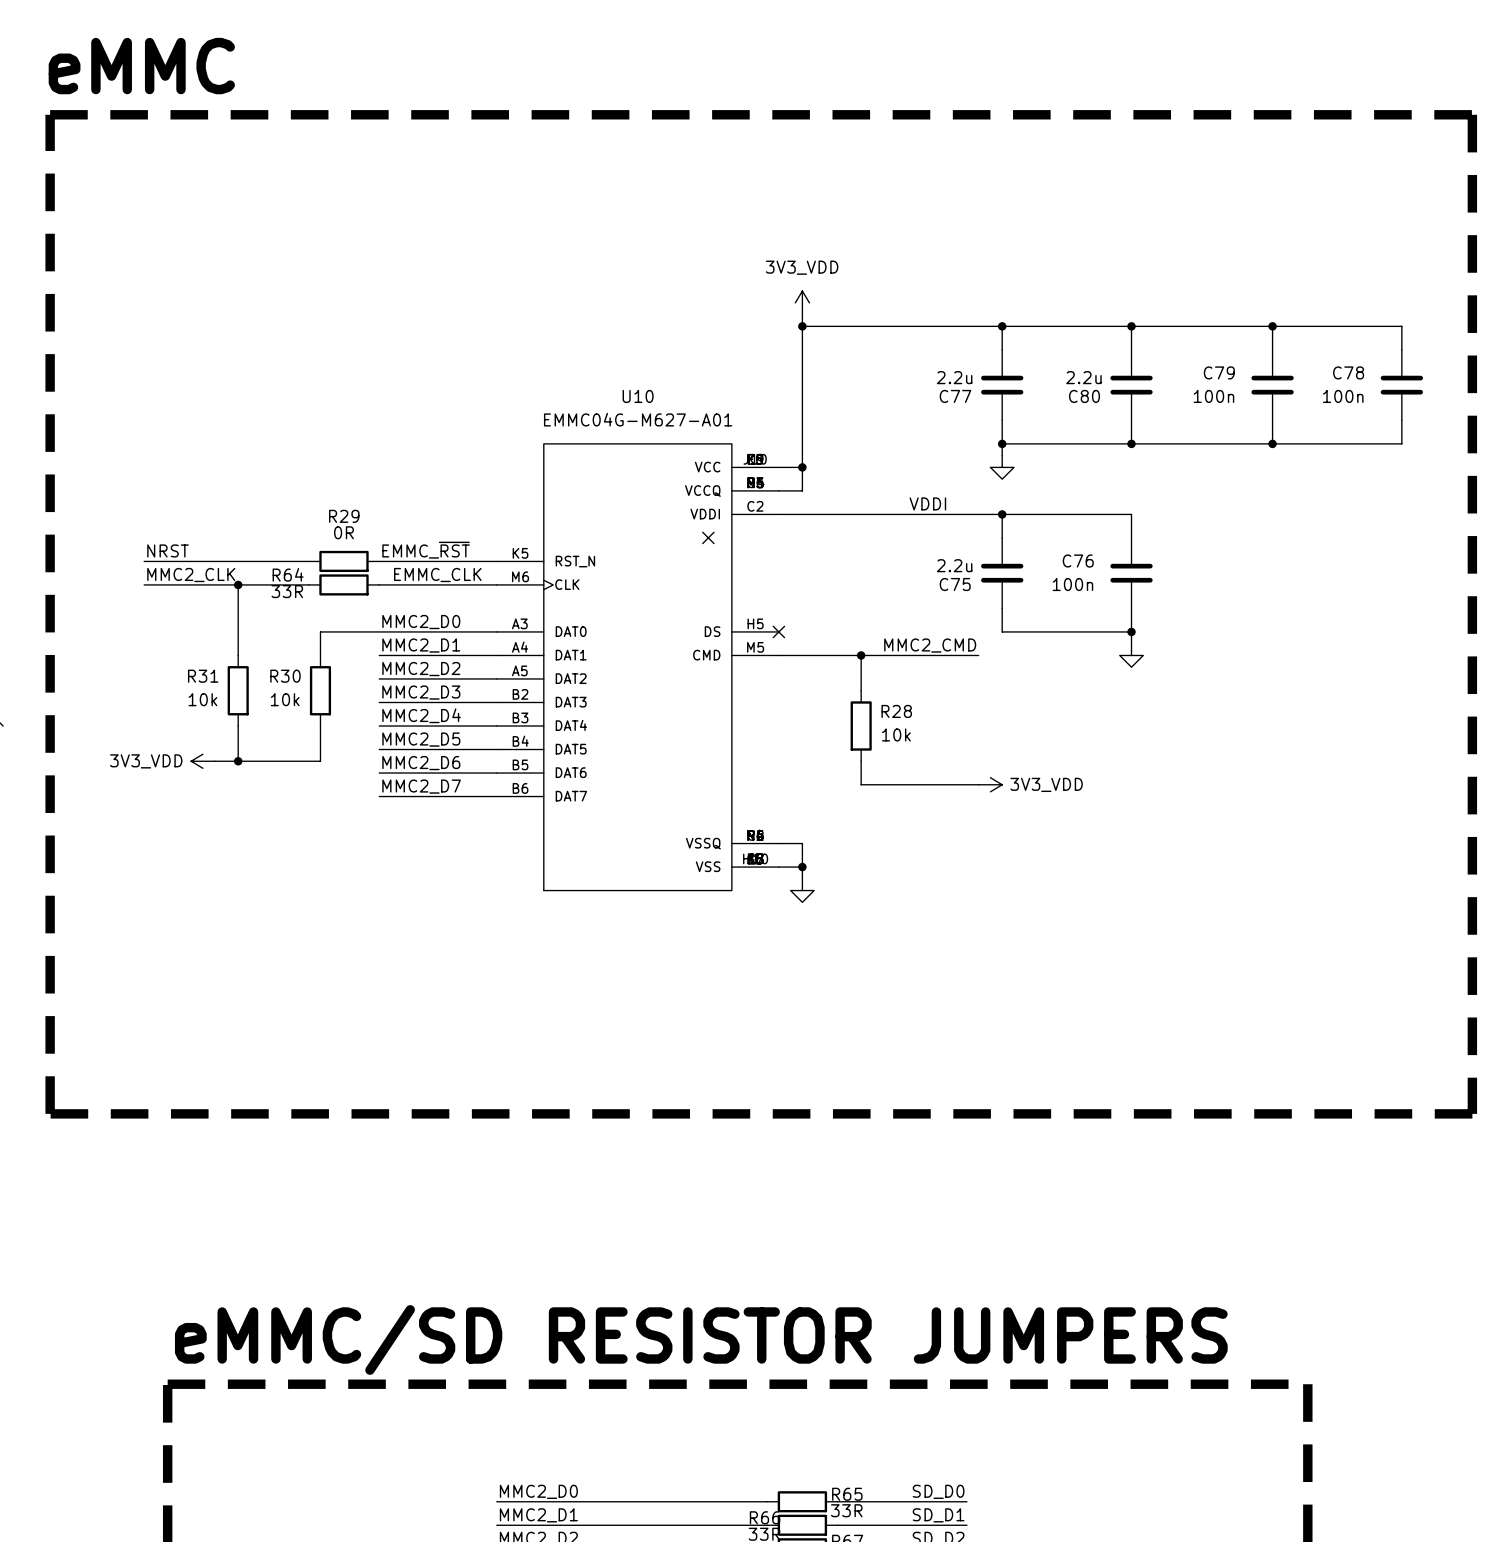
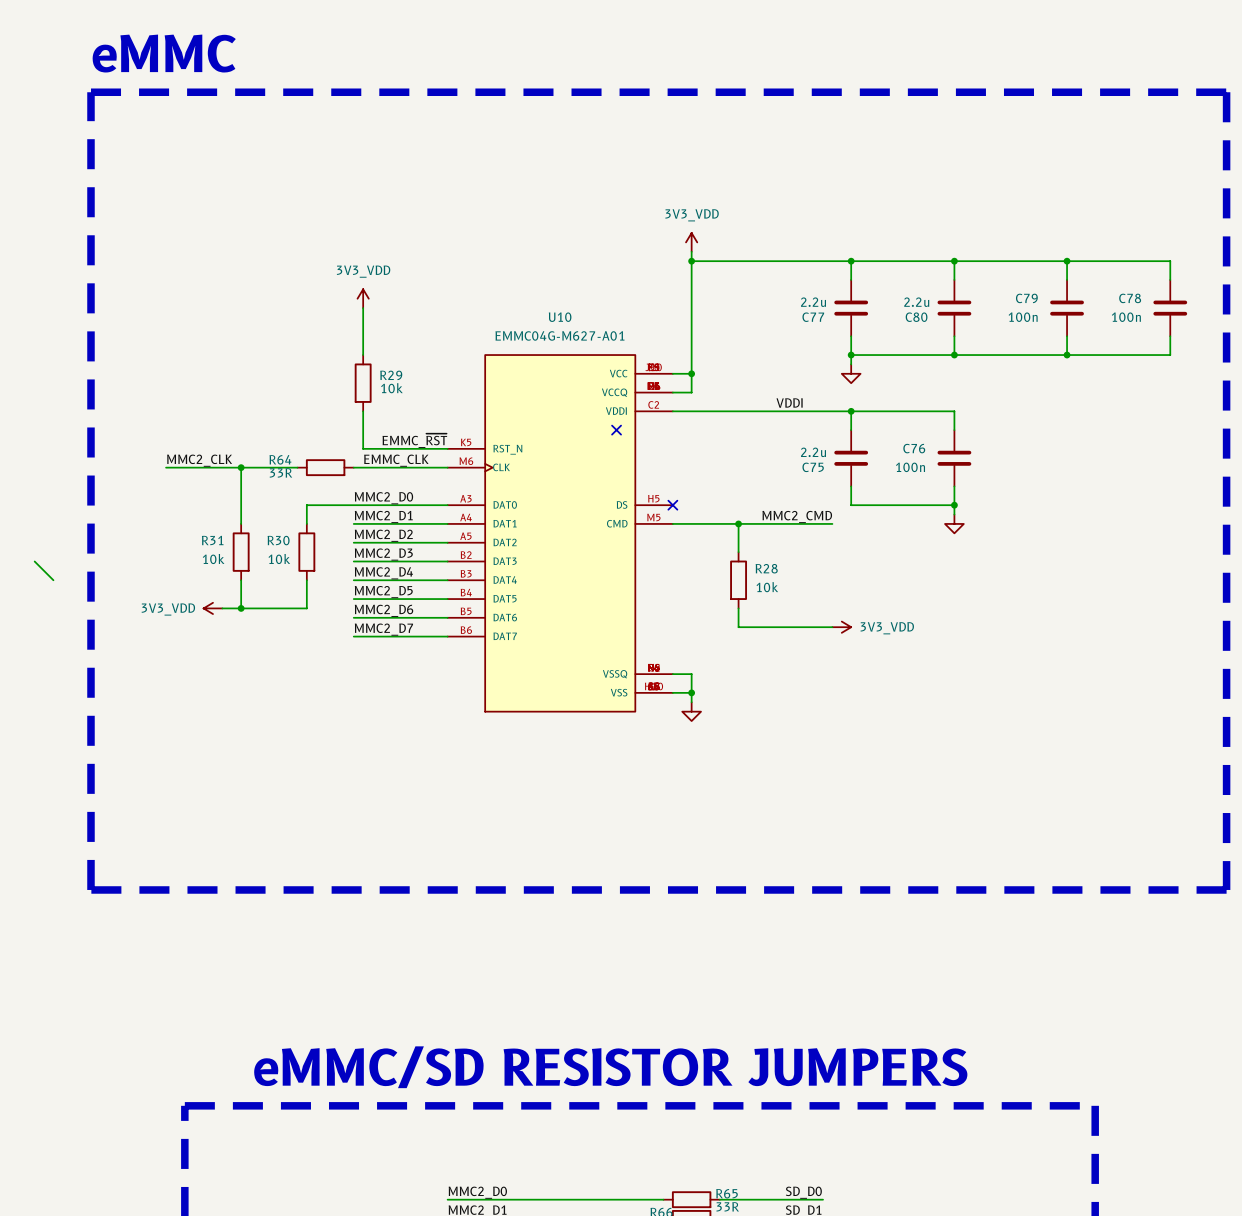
power symbol: none -> 3V3_VDD (363, 298)
wire: none -> (363, 308) (363, 355)
R29 value: 0R (343, 532) -> 10k (391, 388)
label: NRST (168, 550) -> none
label position: EMMC_~{RST} (426, 550) -> EMMC_~{RST} (414, 440)
wire: (144, 561) (308, 561) -> none
R29 rotation: 0° (343, 561) -> 90° clockwise (363, 383)
R29 position: (343, 561) -> (363, 383)
wire: (379, 561) (391, 561) -> (363, 411) (363, 448)

